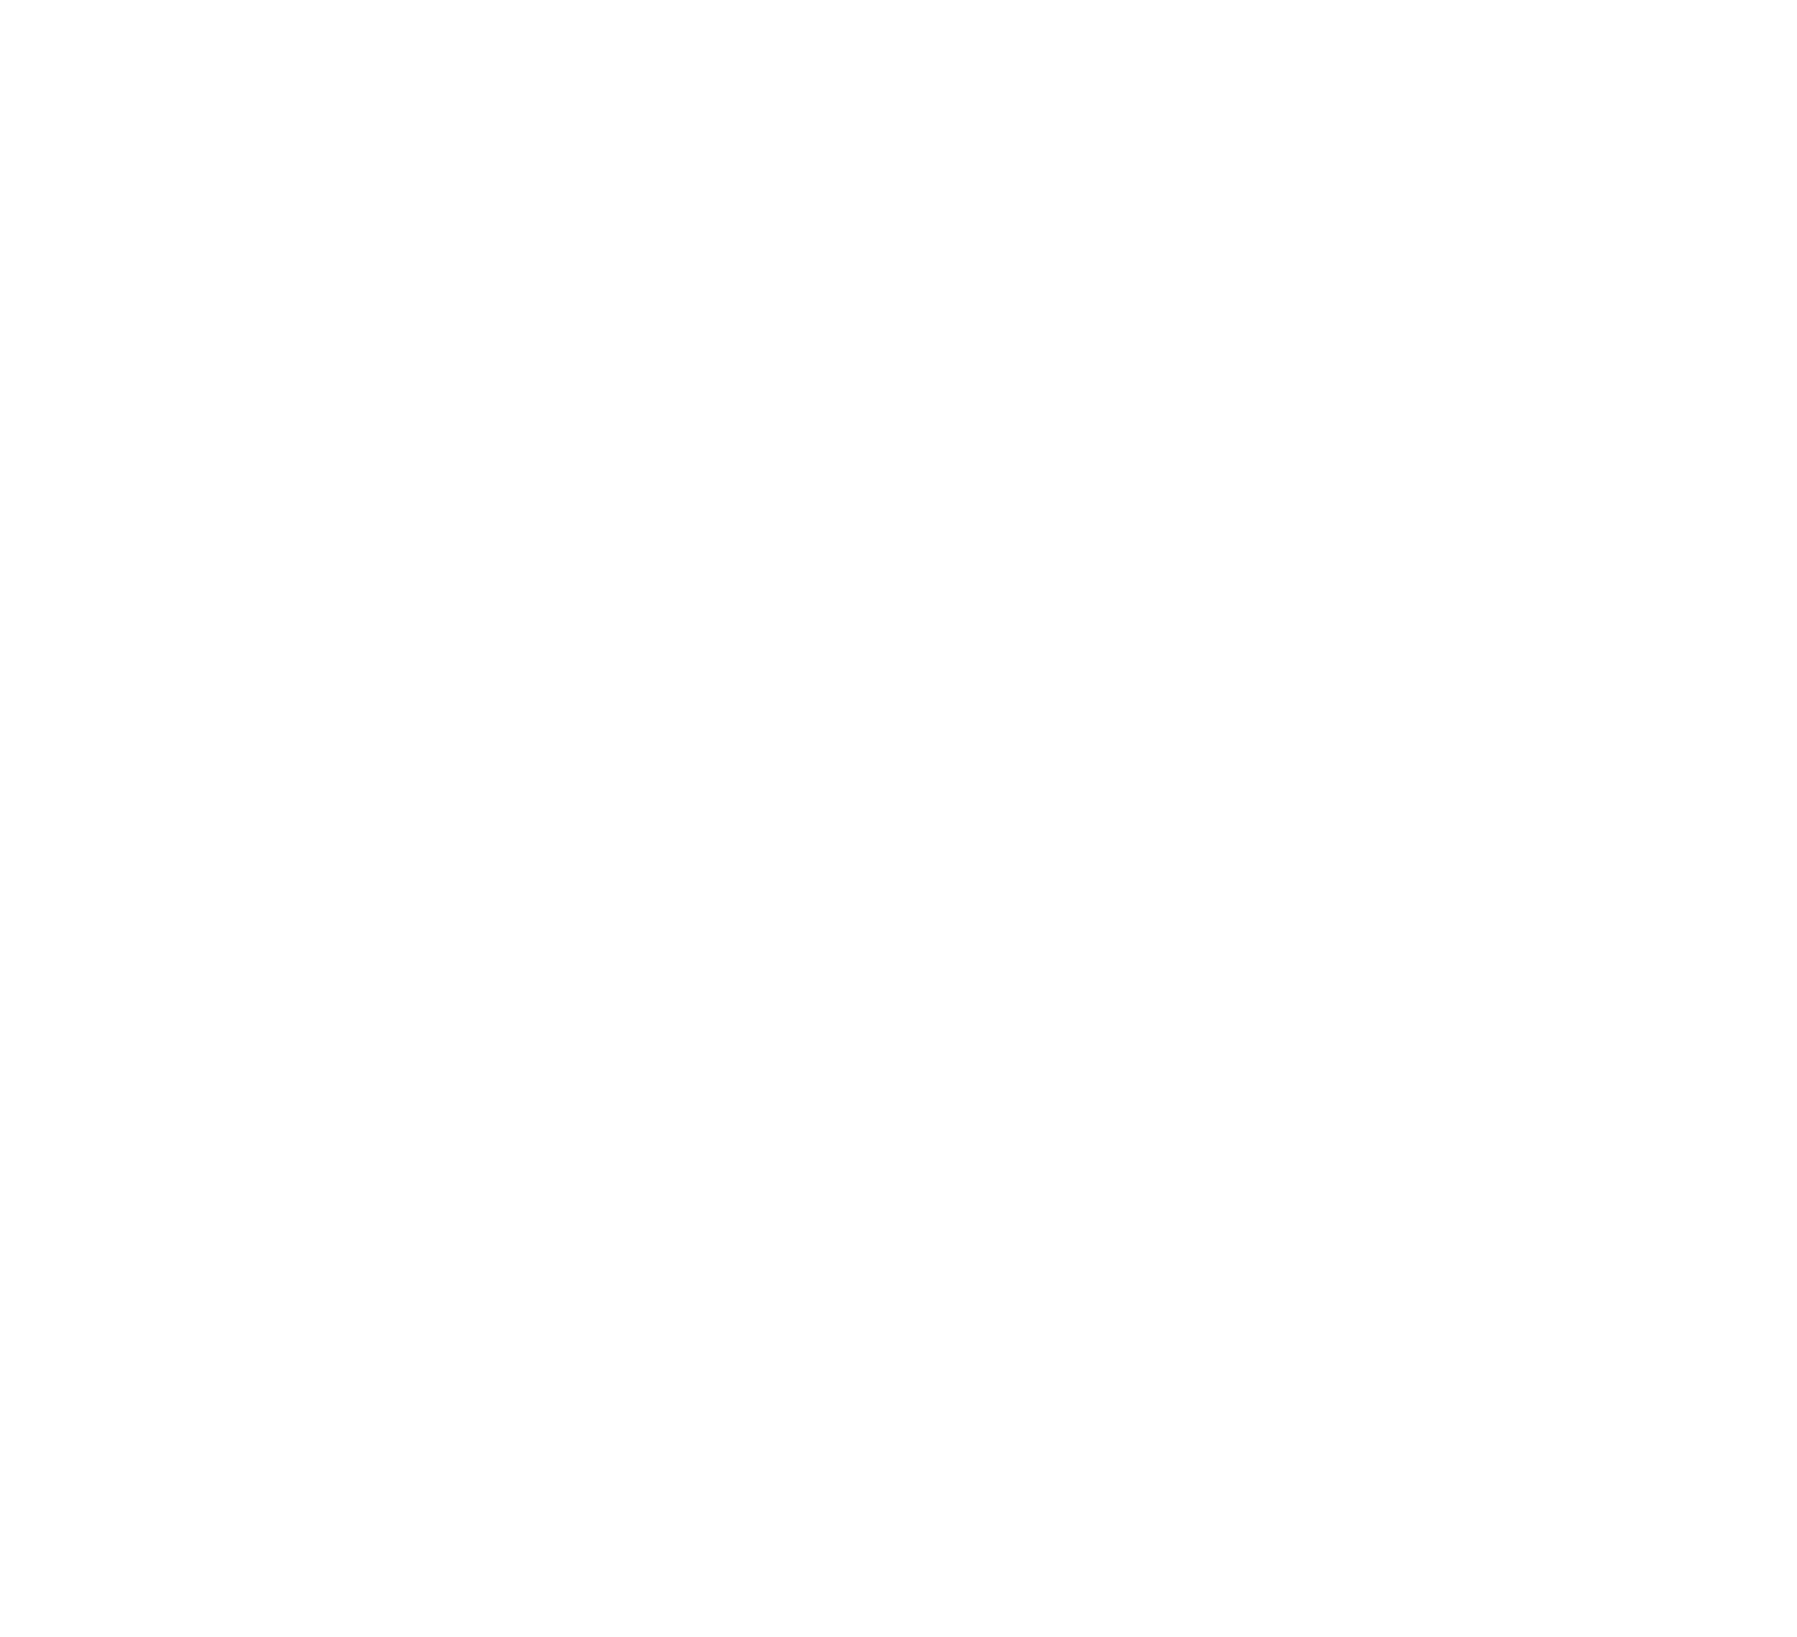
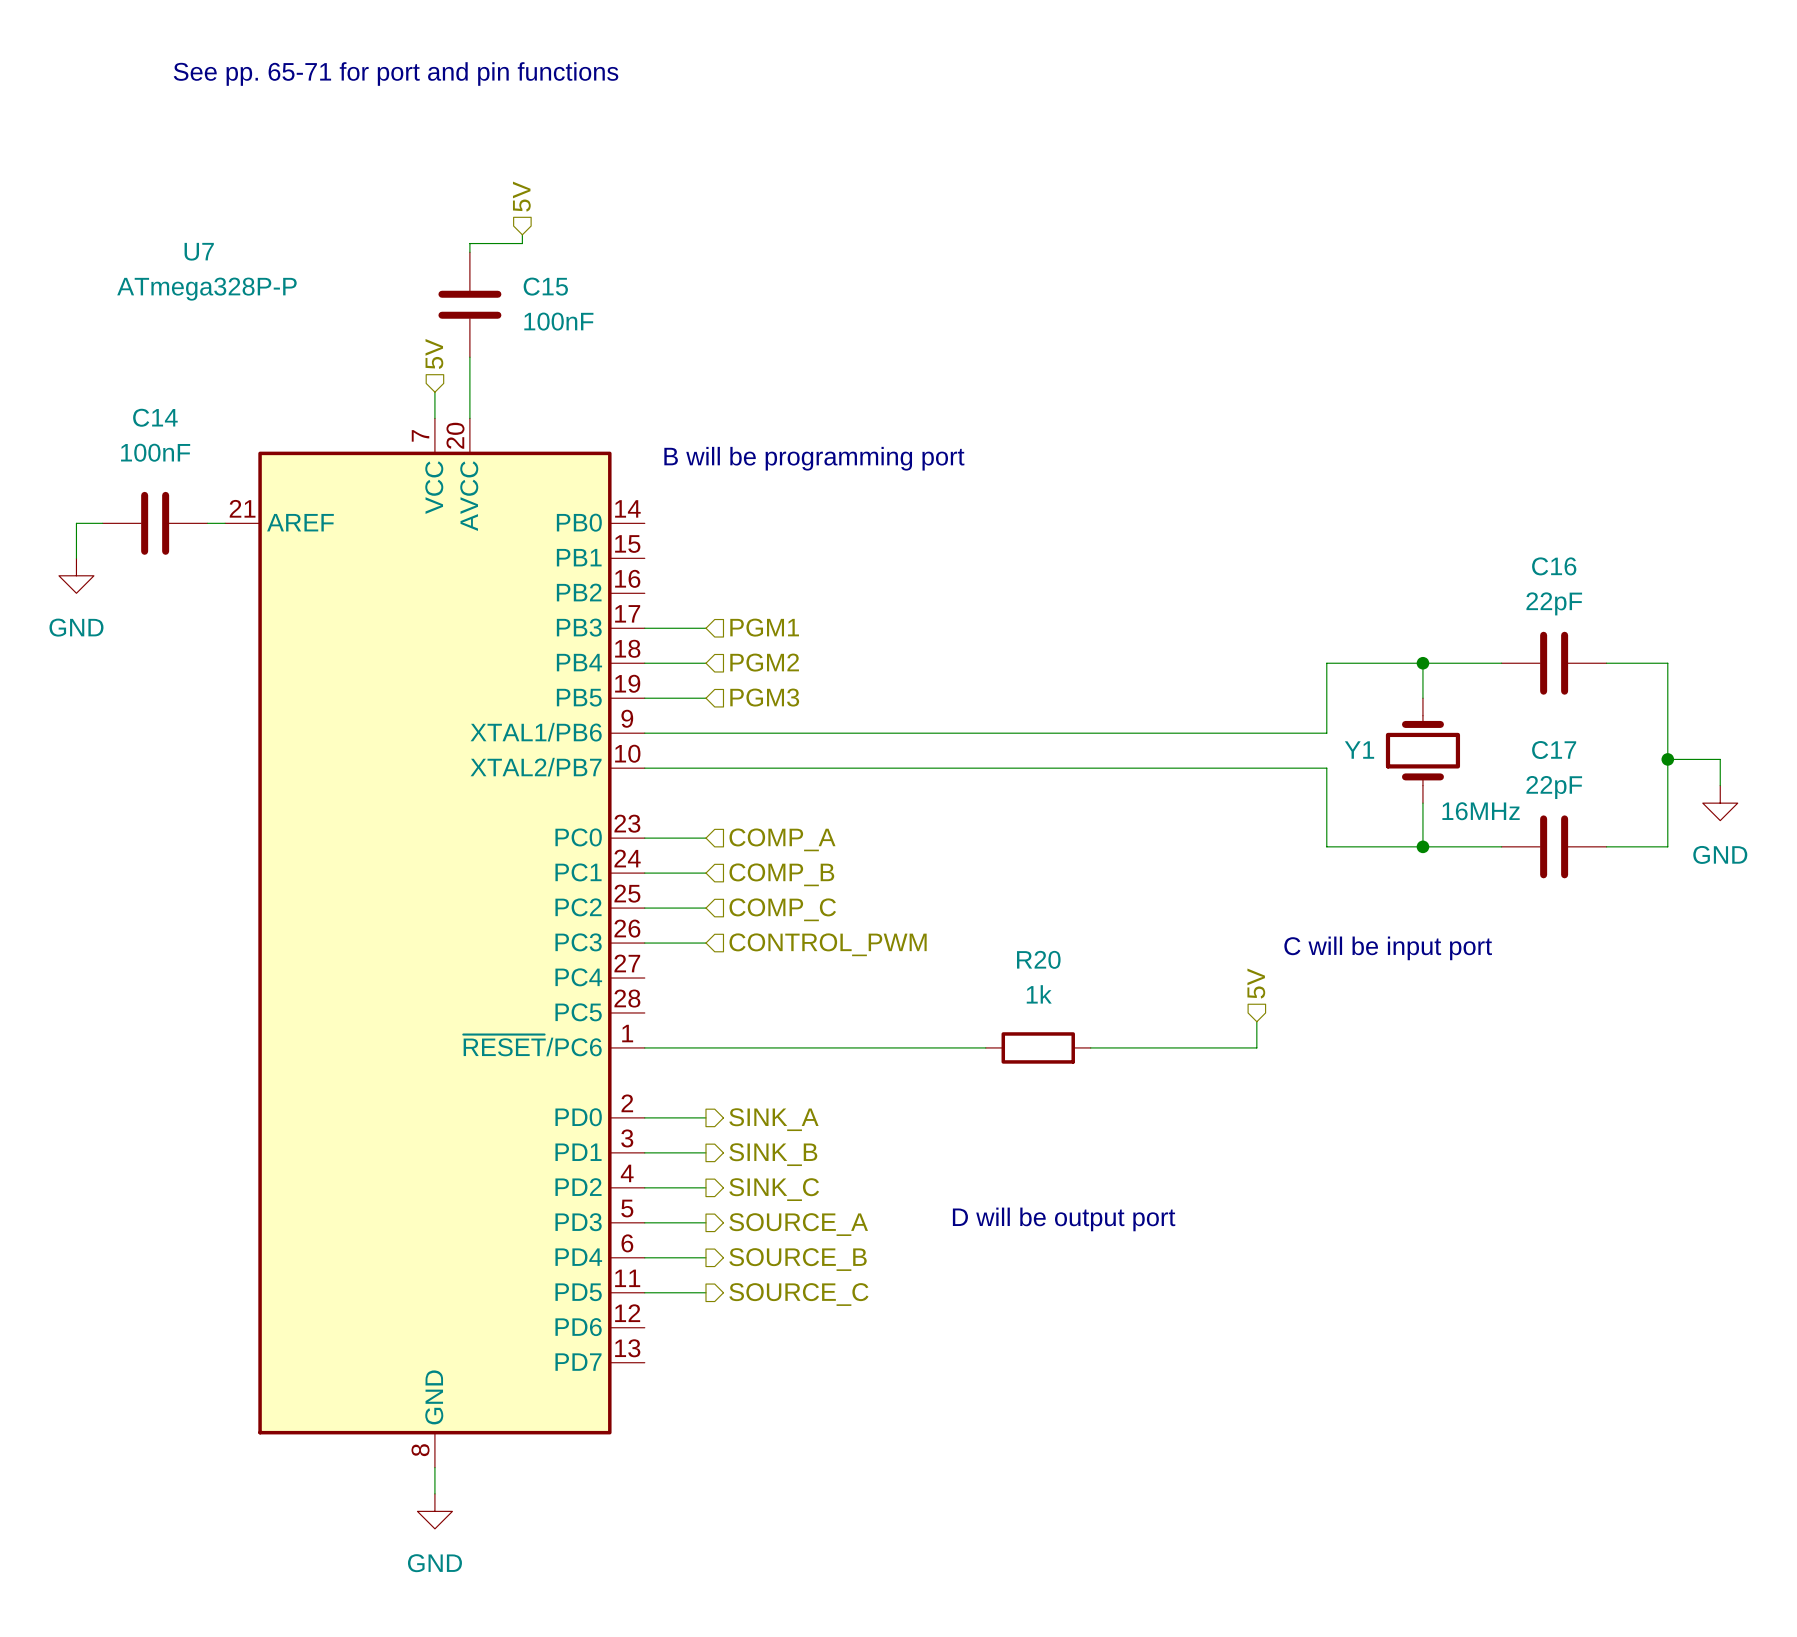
text: none -> See pp. 65-71 for port and pin functions (396, 74)
hierarchical label: none -> 5V (521, 196)
wire: none -> (522, 234) (522, 243) (469, 243) (469, 252)
C15: none -> 100nF (469, 304)
hierarchical label: none -> 5V (434, 353)
wire: none -> (469, 357) (469, 418)
wire: none -> (434, 392) (434, 418)
text: none -> B will be programming port (814, 458)
wire: none -> (102, 523) (76, 523) (76, 558)
C14: none -> 100nF (155, 523)
wire: none -> (207, 523) (225, 523)
power symbol: none -> GND (76, 575)
hierarchical label: none -> PGM1 (764, 627)
wire: none -> (644, 628) (705, 628)
hierarchical label: none -> PGM2 (764, 662)
wire: none -> (644, 663) (705, 663)
wire: none -> (1422, 663) (1422, 698)
junction: none -> (1422, 663)
wire: none -> (1501, 663) (1326, 663) (1326, 733) (644, 733)
C16: none -> 22pF (1554, 663)
wire: none -> (1606, 663) (1667, 663) (1667, 846) (1606, 846)
hierarchical label: none -> PGM3 (764, 697)
wire: none -> (644, 698) (705, 698)
Y1: none -> 16MHz (1422, 750)
wire: none -> (1667, 759) (1720, 759) (1720, 785)
junction: none -> (1667, 759)
wire: none -> (644, 768) (1326, 768) (1326, 846) (1501, 846)
wire: none -> (1422, 803) (1422, 846)
power symbol: none -> GND (1720, 803)
wire: none -> (644, 838) (705, 838)
hierarchical label: none -> COMP_A (782, 839)
junction: none -> (1422, 846)
C17: none -> 22pF (1554, 846)
wire: none -> (644, 873) (705, 873)
hierarchical label: none -> COMP_B (781, 874)
wire: none -> (644, 908) (705, 908)
hierarchical label: none -> COMP_C (782, 909)
U7: none -> ATmega328P-P (434, 943)
wire: none -> (644, 943) (705, 943)
hierarchical label: none -> CONTROL_PWM (828, 944)
text: none -> C will be input port (1388, 948)
hierarchical label: none -> 5V (1256, 983)
wire: none -> (1256, 1021) (1256, 1047) (1090, 1047)
wire: none -> (644, 1047) (985, 1047)
R20: none -> 1k (1038, 1047)
wire: none -> (644, 1117) (705, 1117)
hierarchical label: none -> SINK_A (773, 1119)
wire: none -> (644, 1152) (705, 1152)
hierarchical label: none -> SINK_B (773, 1154)
wire: none -> (644, 1187) (705, 1187)
hierarchical label: none -> SINK_C (774, 1189)
text: none -> D will be output port (1064, 1219)
wire: none -> (644, 1222) (705, 1222)
hierarchical label: none -> SOURCE_A (798, 1224)
wire: none -> (644, 1257) (705, 1257)
hierarchical label: none -> SOURCE_B (798, 1259)
wire: none -> (644, 1292) (705, 1292)
hierarchical label: none -> SOURCE_C (798, 1294)
wire: none -> (434, 1467) (434, 1493)
power symbol: none -> GND (434, 1511)

